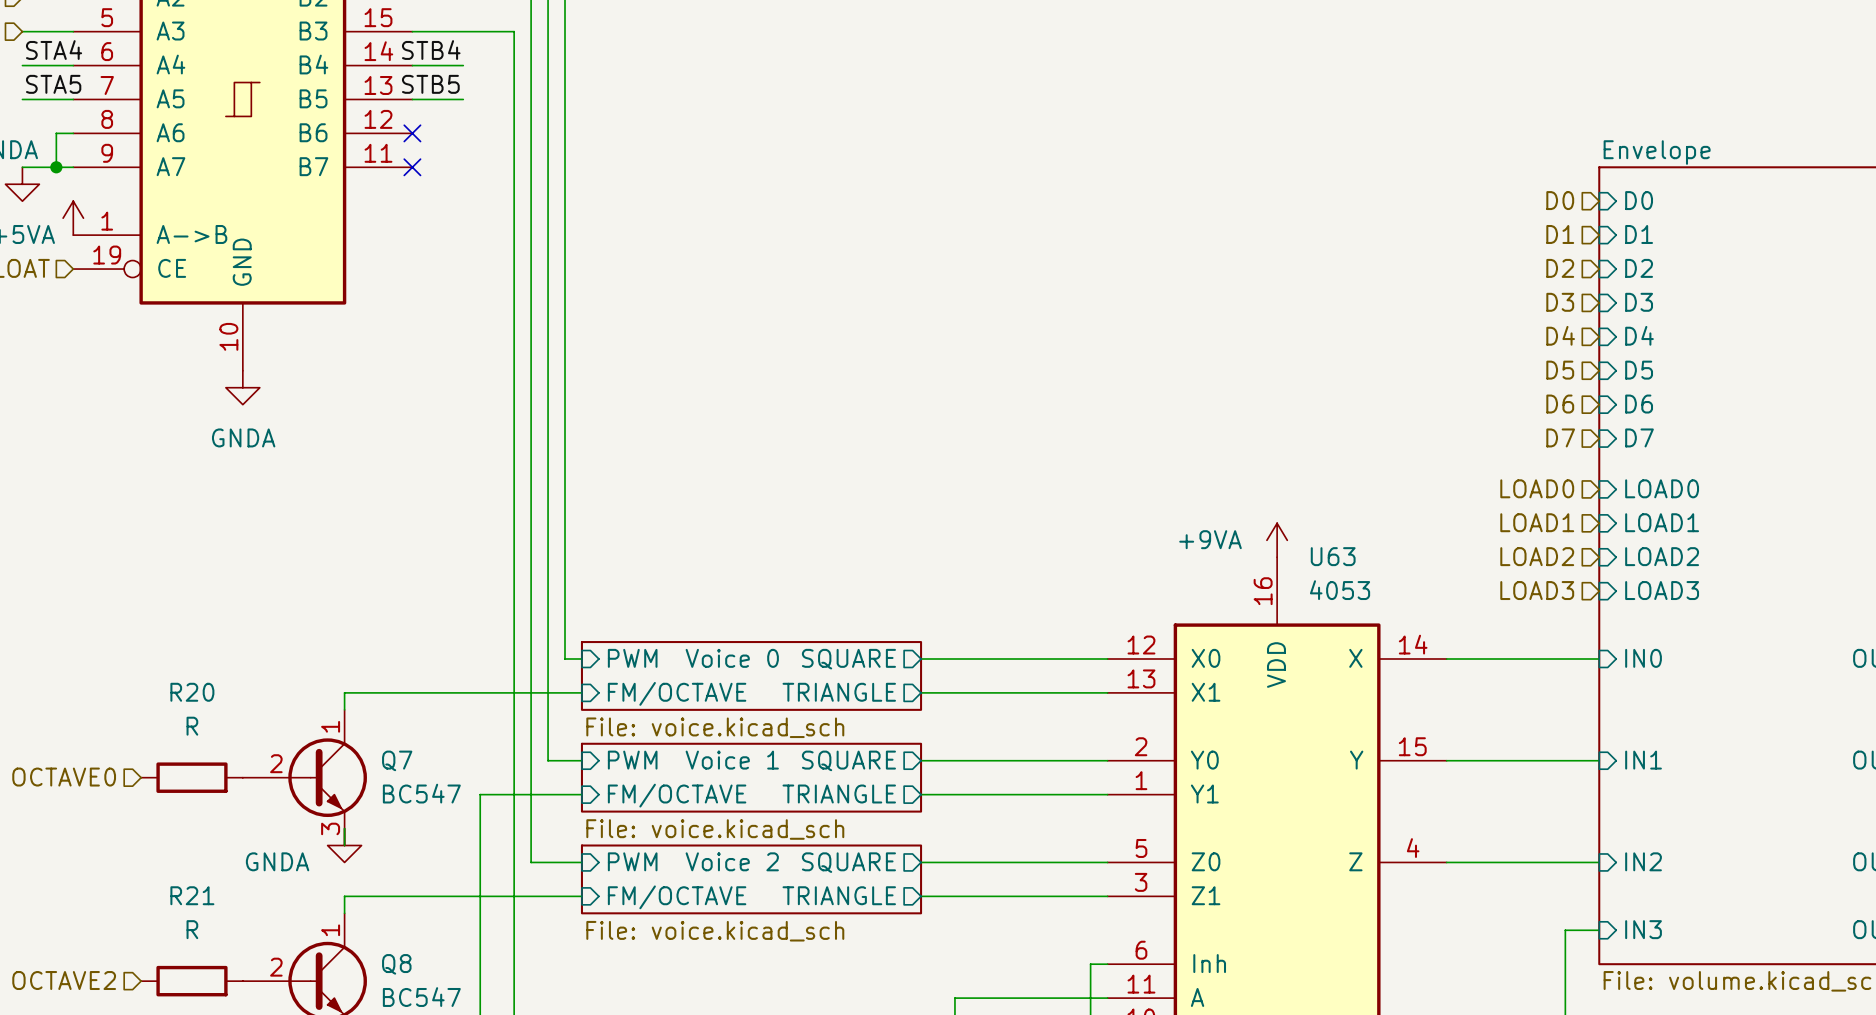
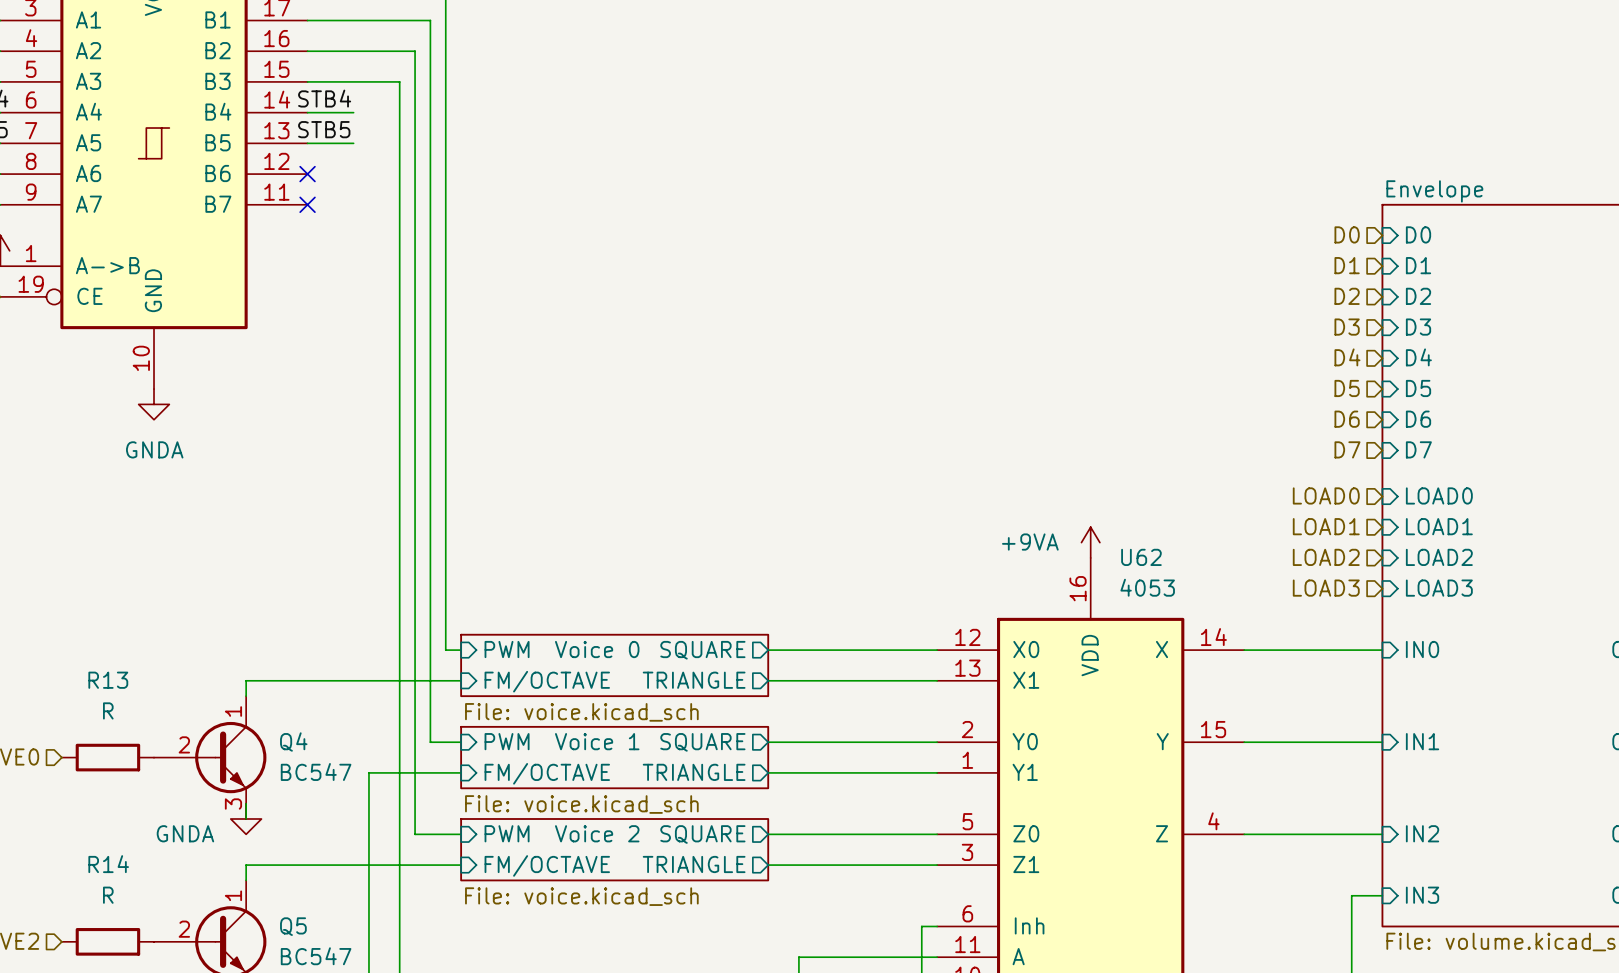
U63 name: U63 (1333, 556) -> U62 (1141, 557)
R20 name: R20 (192, 692) -> R13 (108, 680)
Q7 name: Q7 (397, 760) -> Q4 (293, 742)
R21 name: R21 (192, 895) -> R14 (108, 864)
Q8 name: Q8 (396, 964) -> Q5 (293, 926)

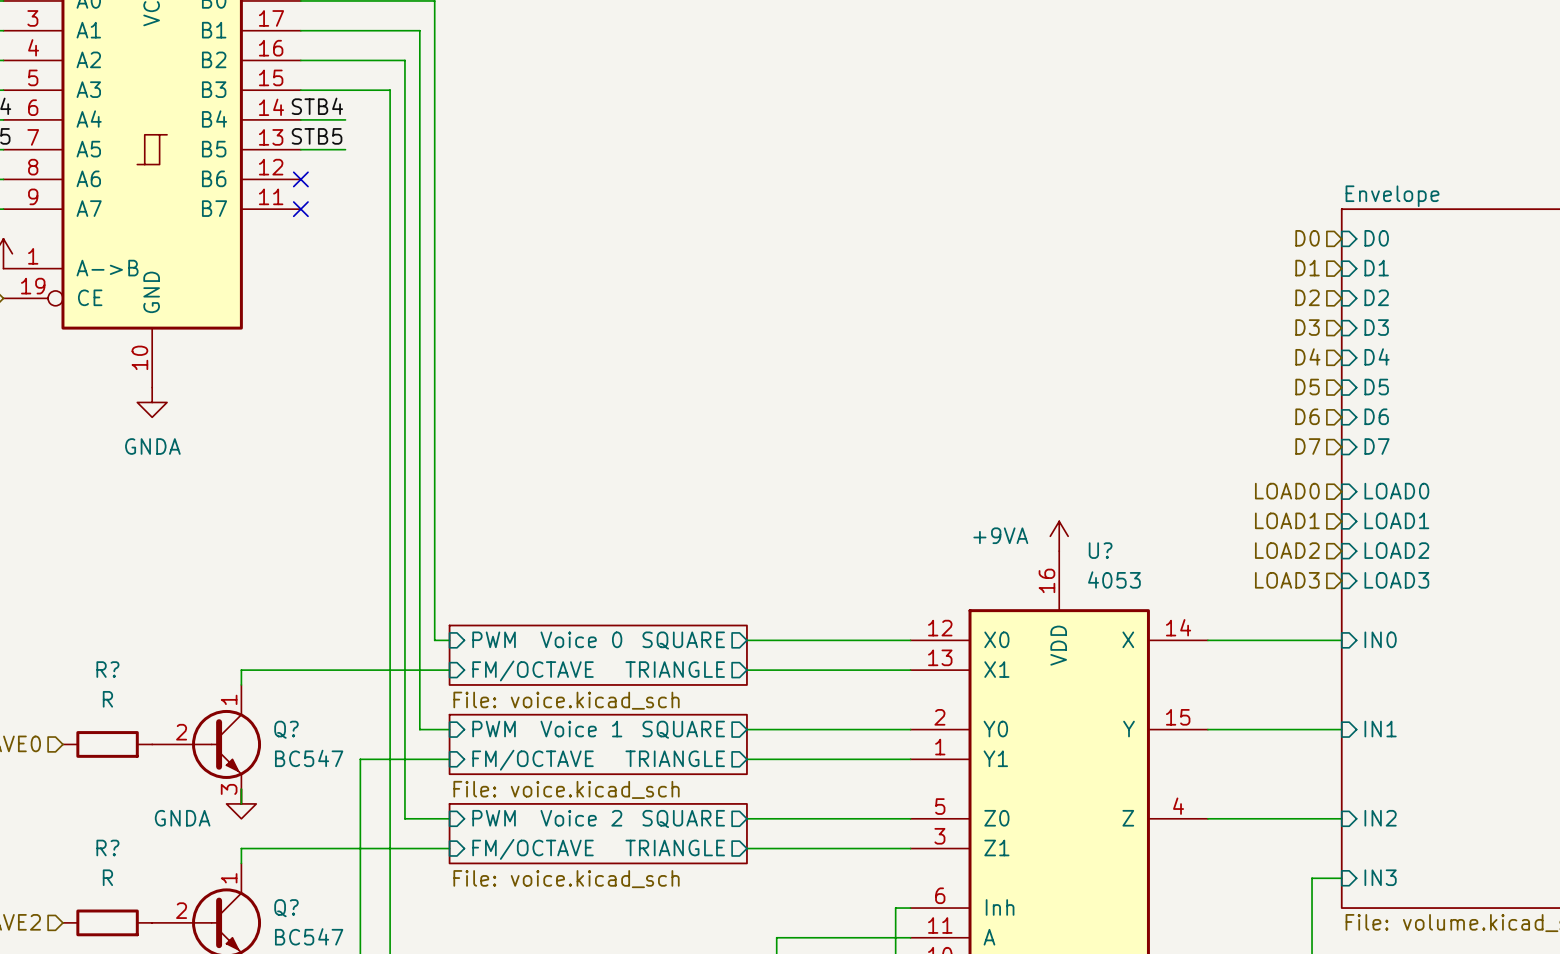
U62 name: U62 (1141, 557) -> U? (1100, 550)
R13 name: R13 (108, 680) -> R? (107, 669)
Q4 name: Q4 (293, 742) -> Q? (286, 729)
R14 name: R14 (108, 864) -> R? (107, 847)
Q5 name: Q5 (293, 926) -> Q? (286, 908)

